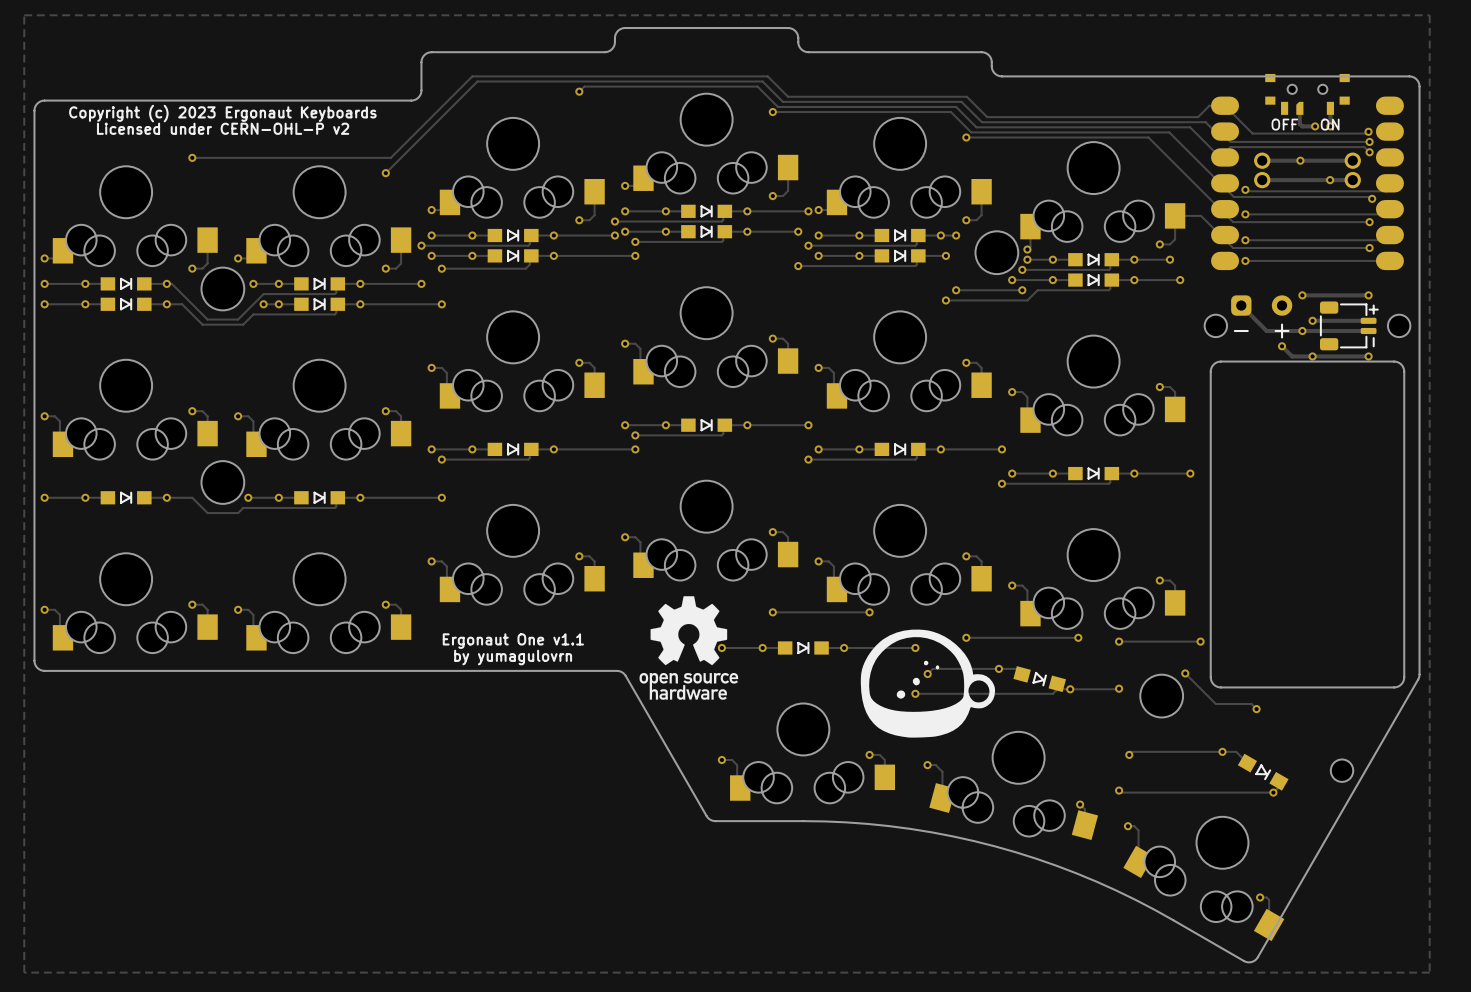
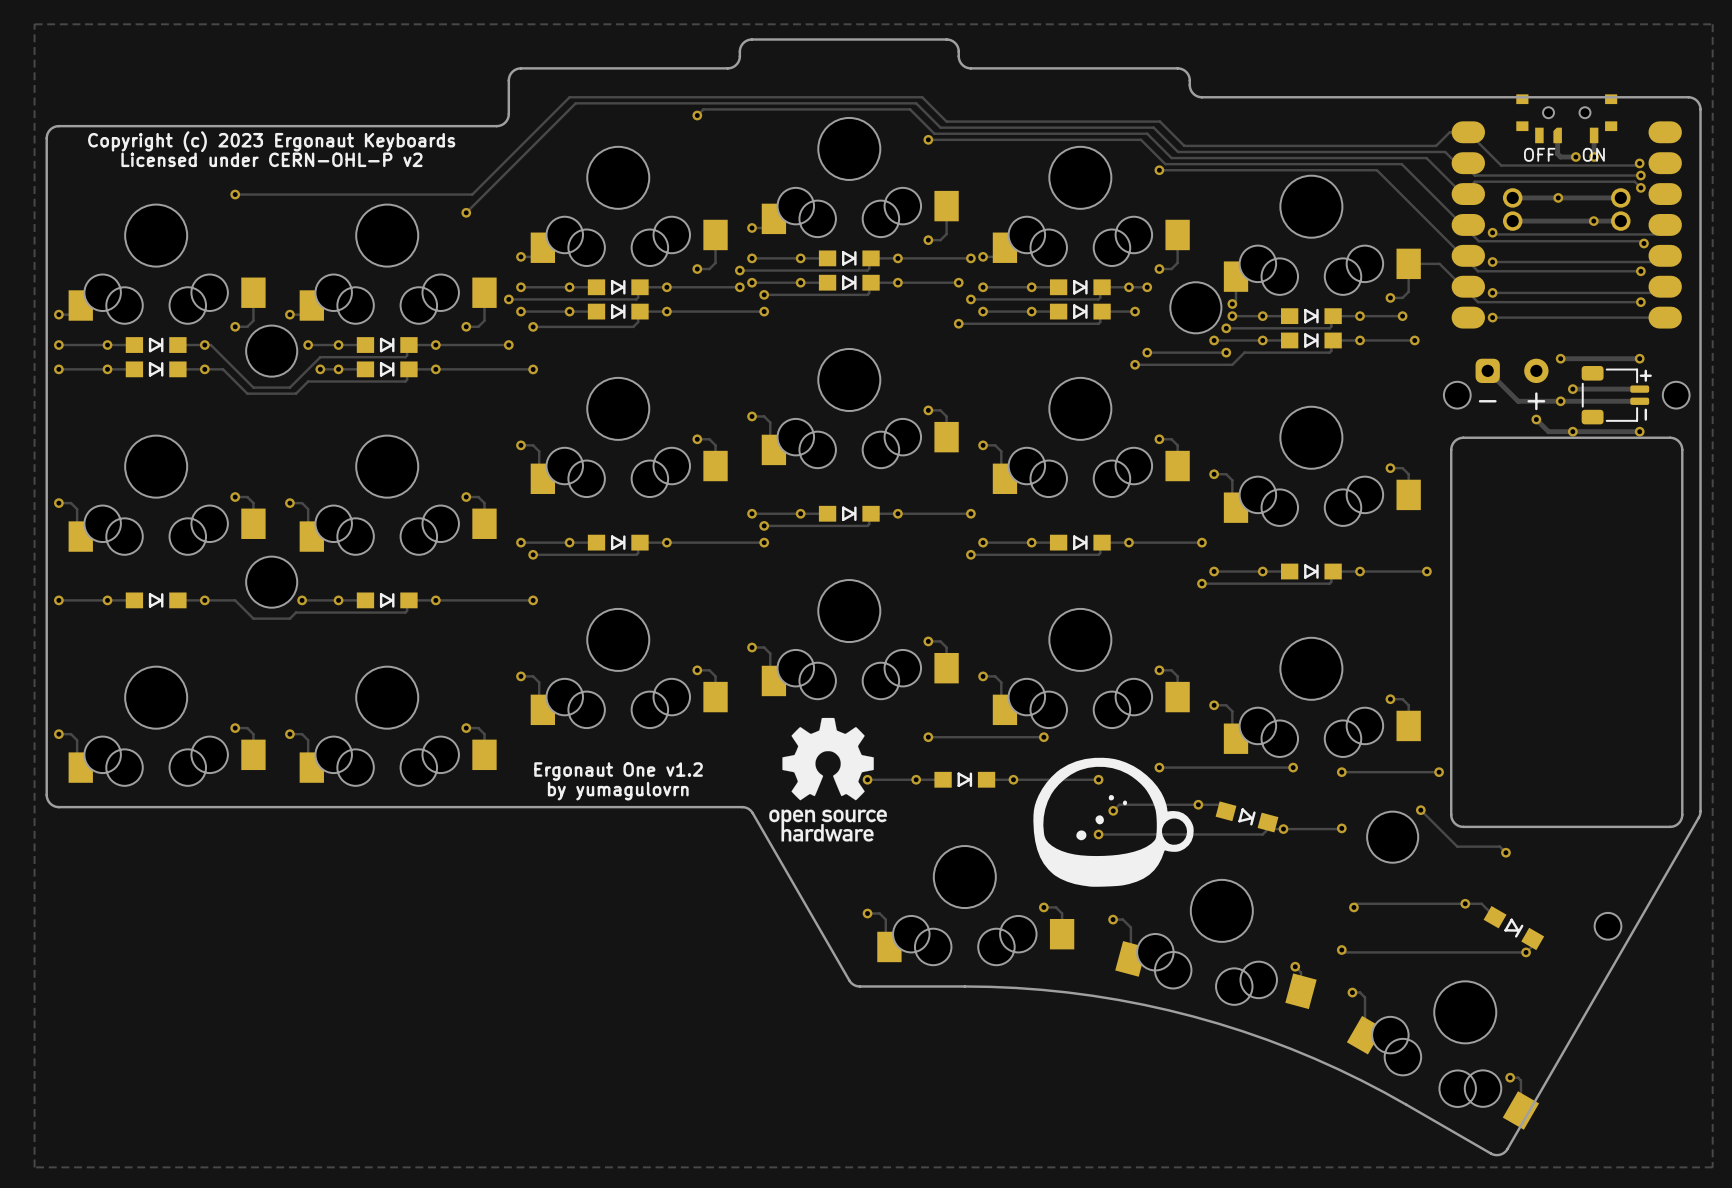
text: Ergonaut One v1.1 (513, 641) -> Ergonaut One v1.2 (618, 771)

